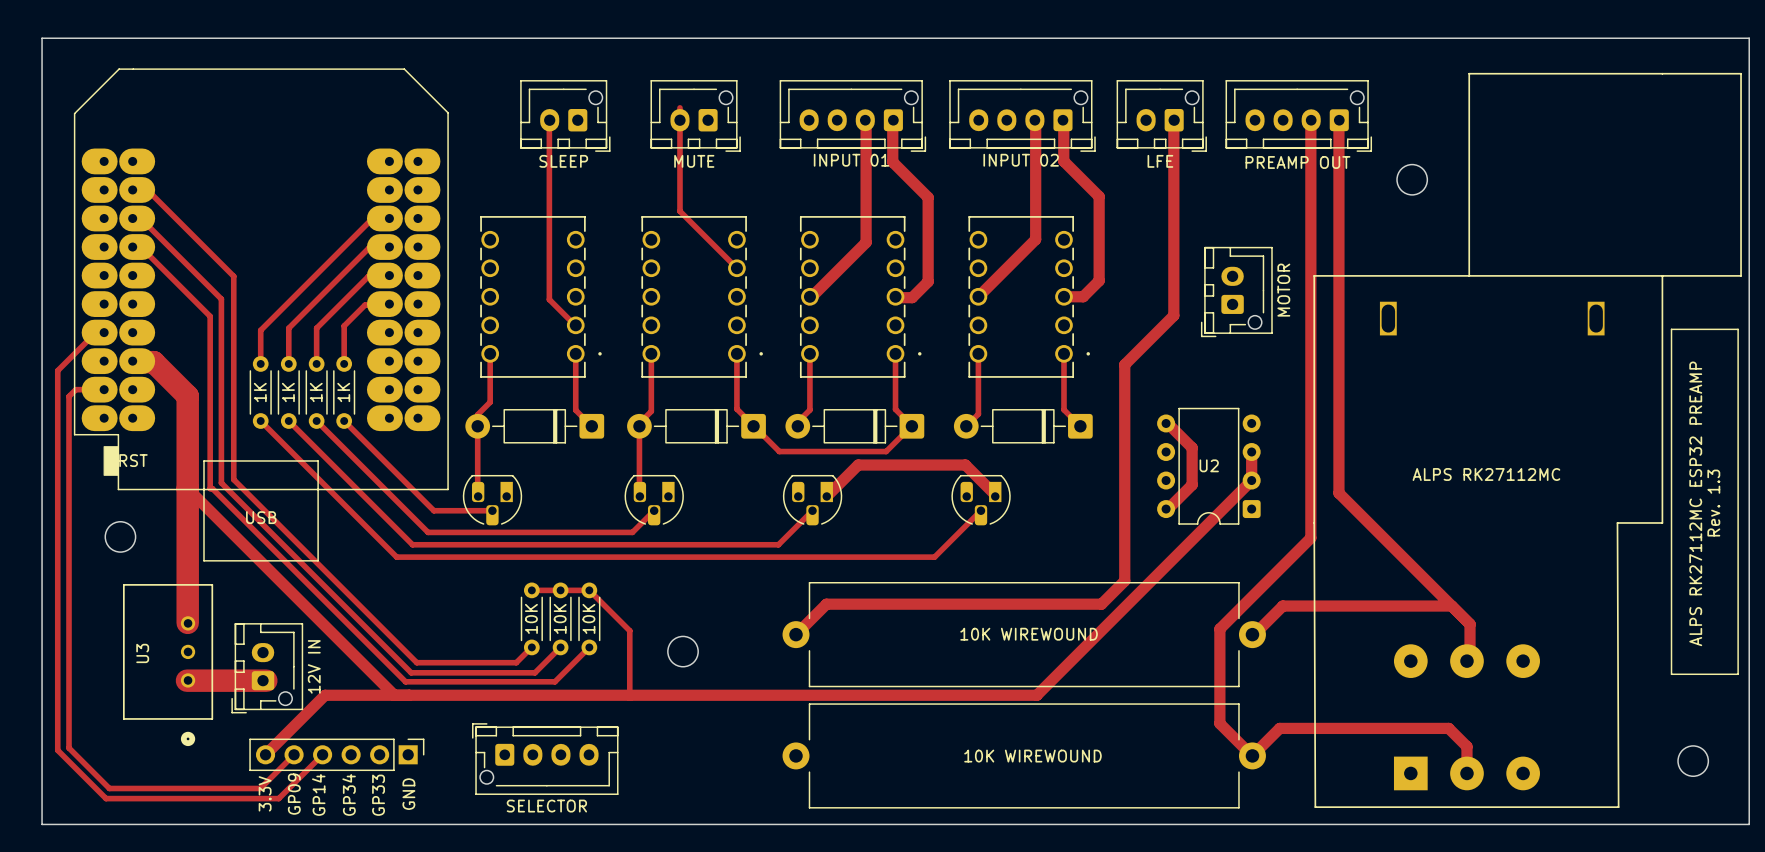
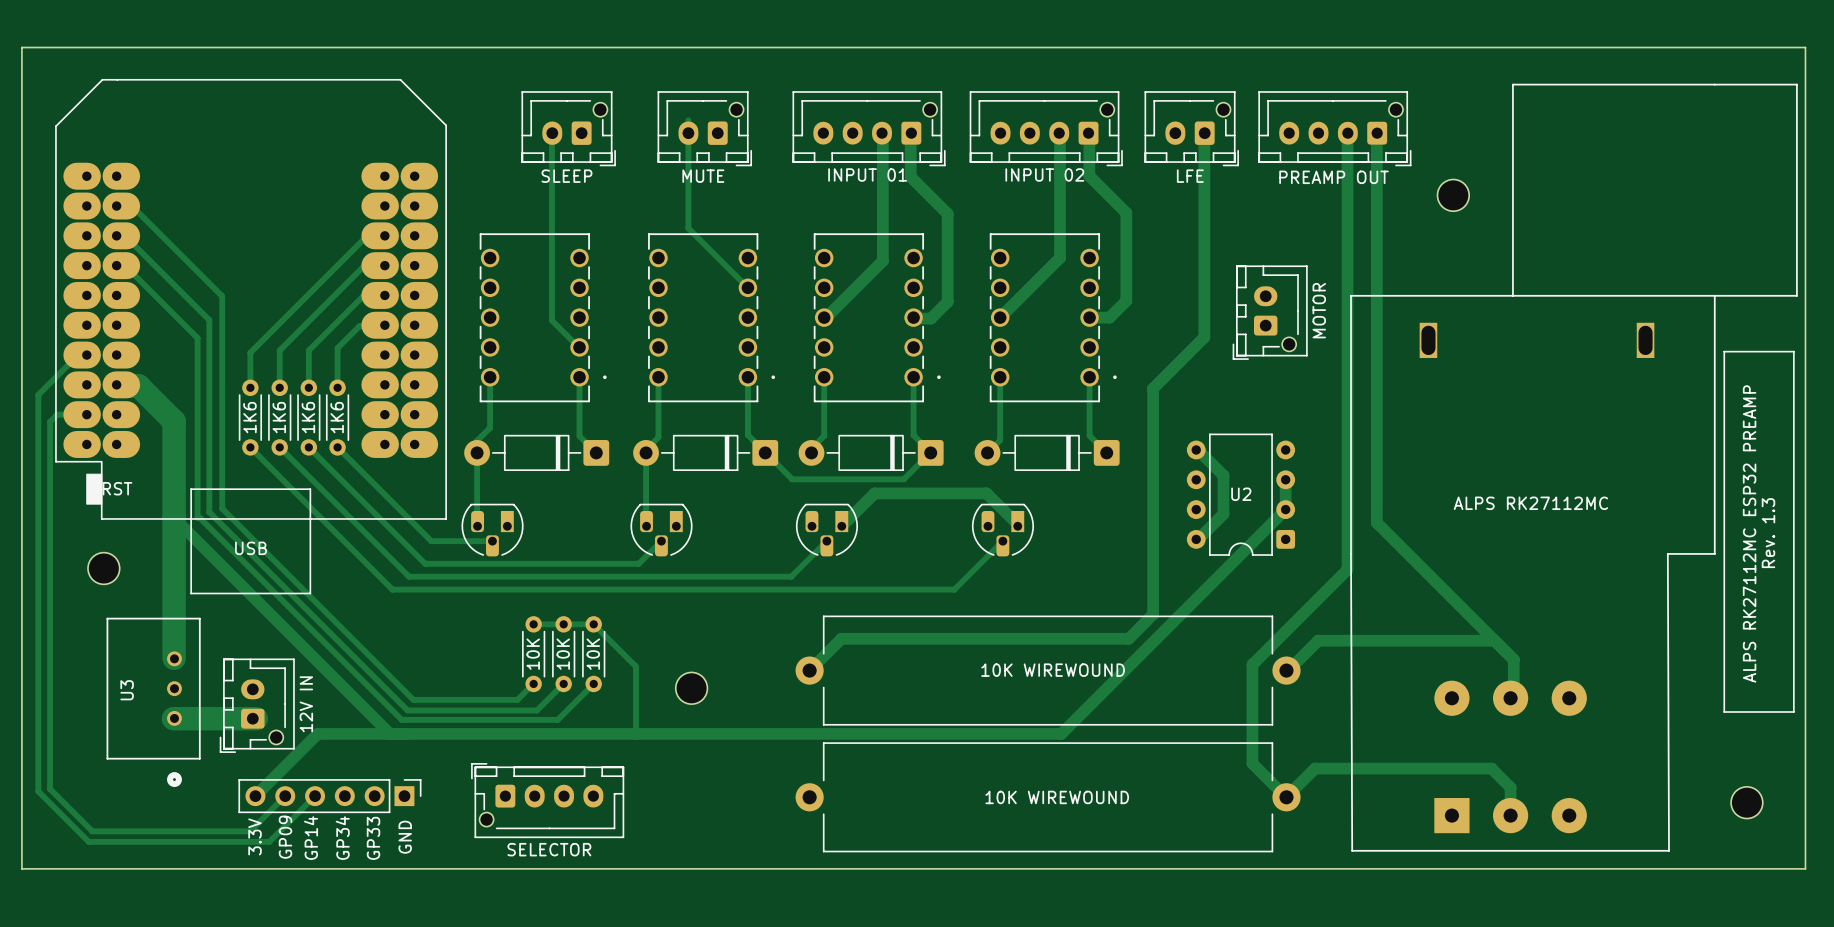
part value: 1K (260, 392) -> 1K6 (249, 417)
part value: 1K (288, 392) -> 1K6 (279, 417)
part value: 1K (316, 392) -> 1K6 (308, 417)
part value: 1K (343, 392) -> 1K6 (337, 417)

